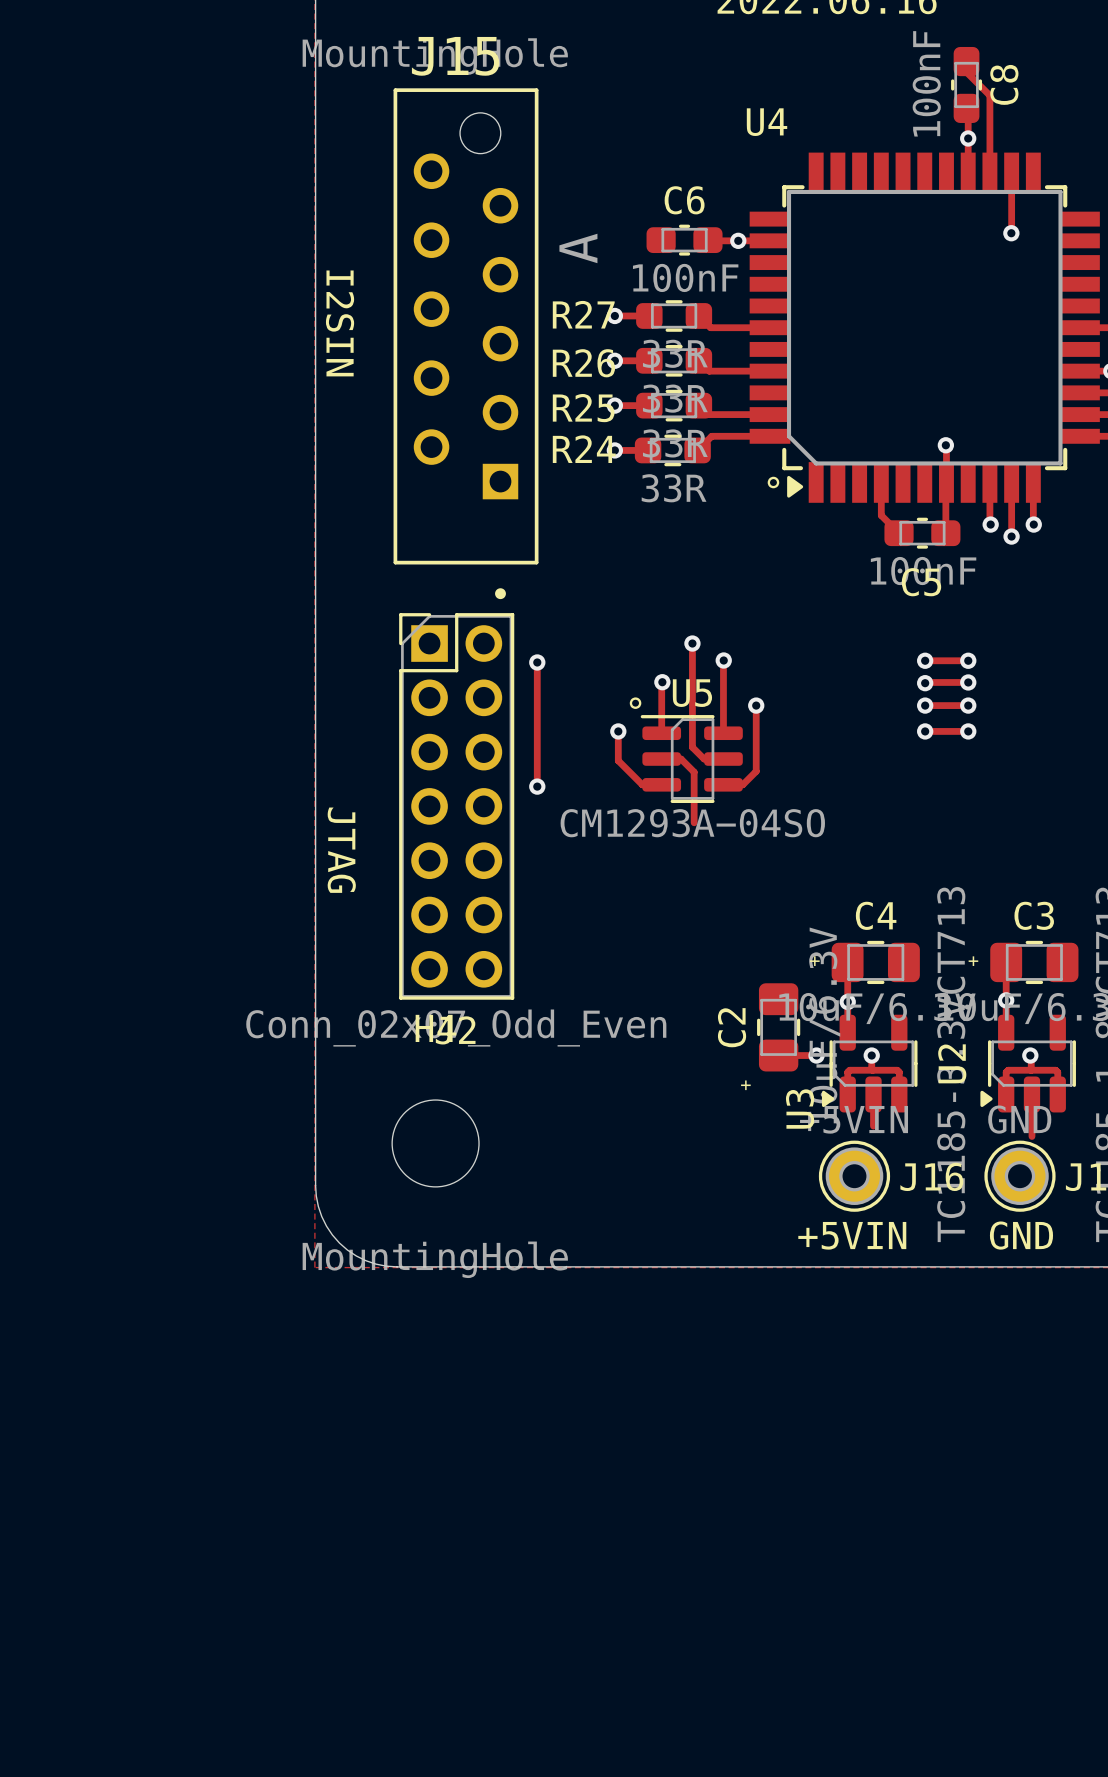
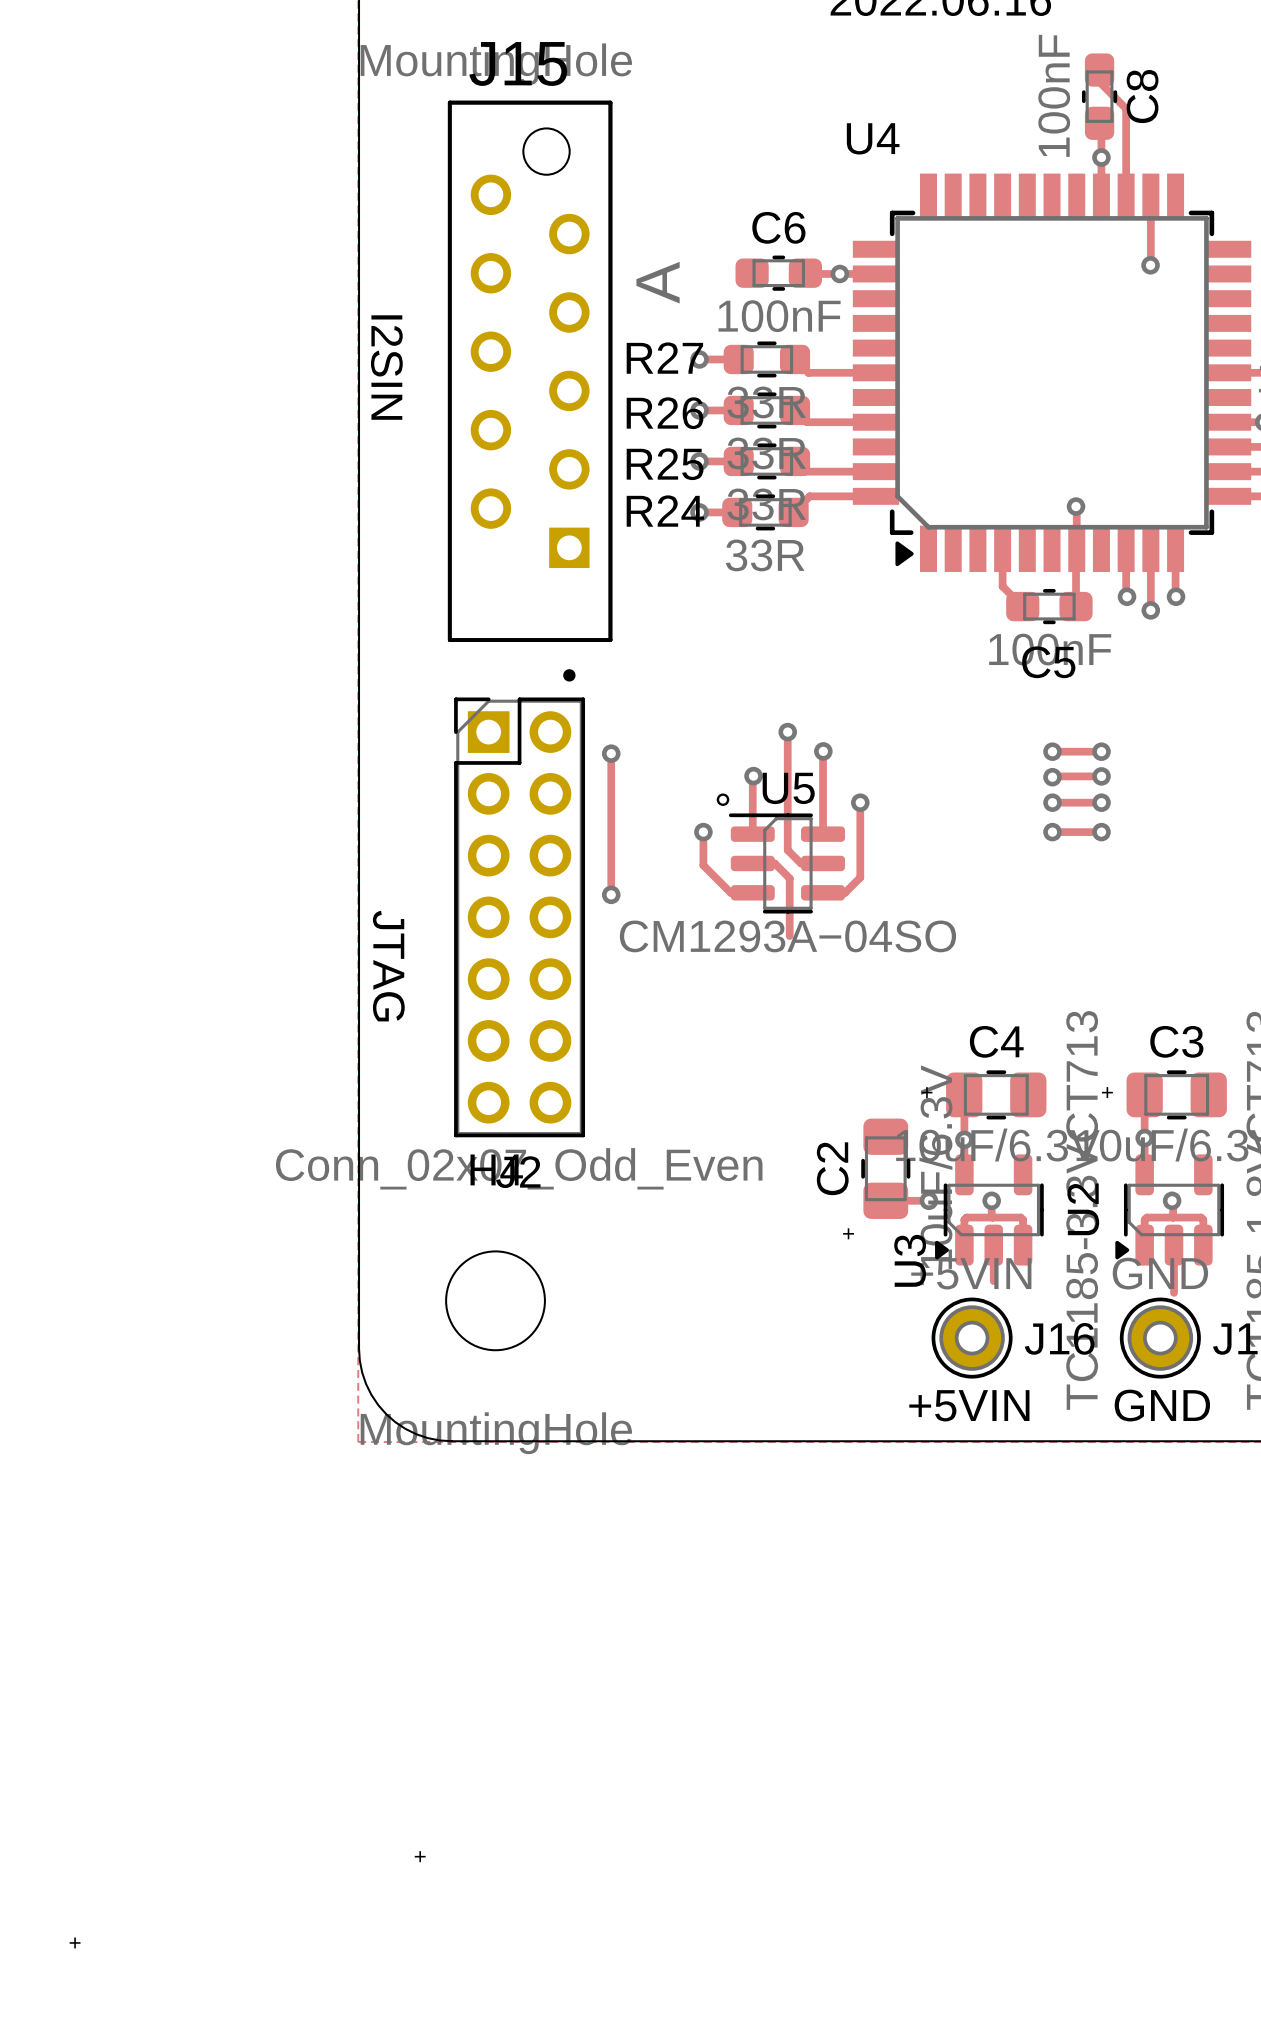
text: ° (773, 482) -> none
text: none -> + (420, 1856)
text: none -> + (75, 1942)

